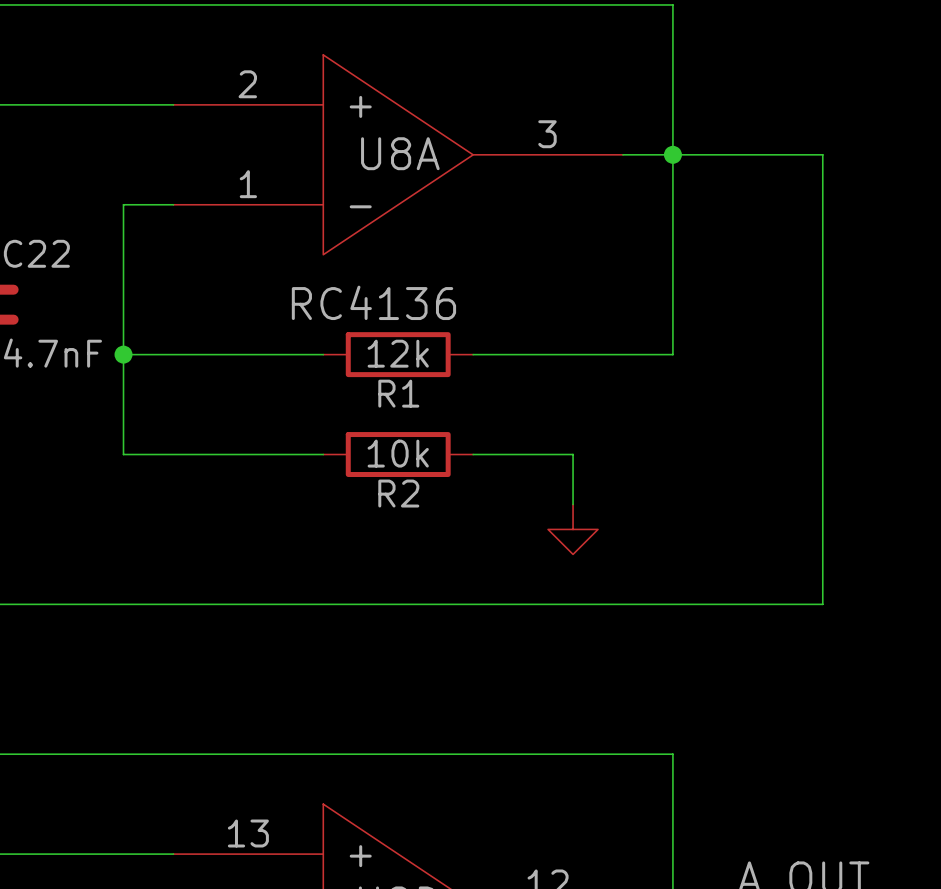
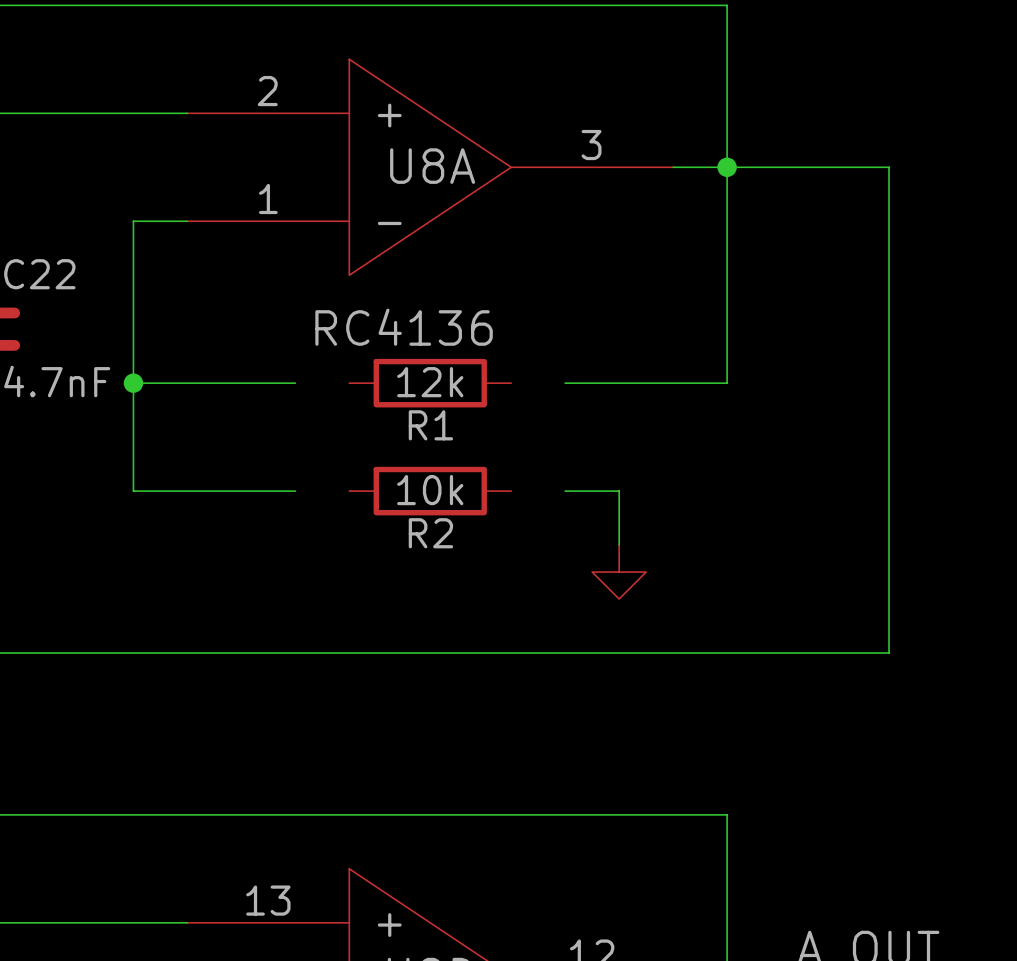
wire: (273, 354) (323, 354) -> none
wire: (473, 354) (523, 354) -> none
wire: (273, 454) (323, 454) -> none
wire: (473, 454) (523, 454) -> none

